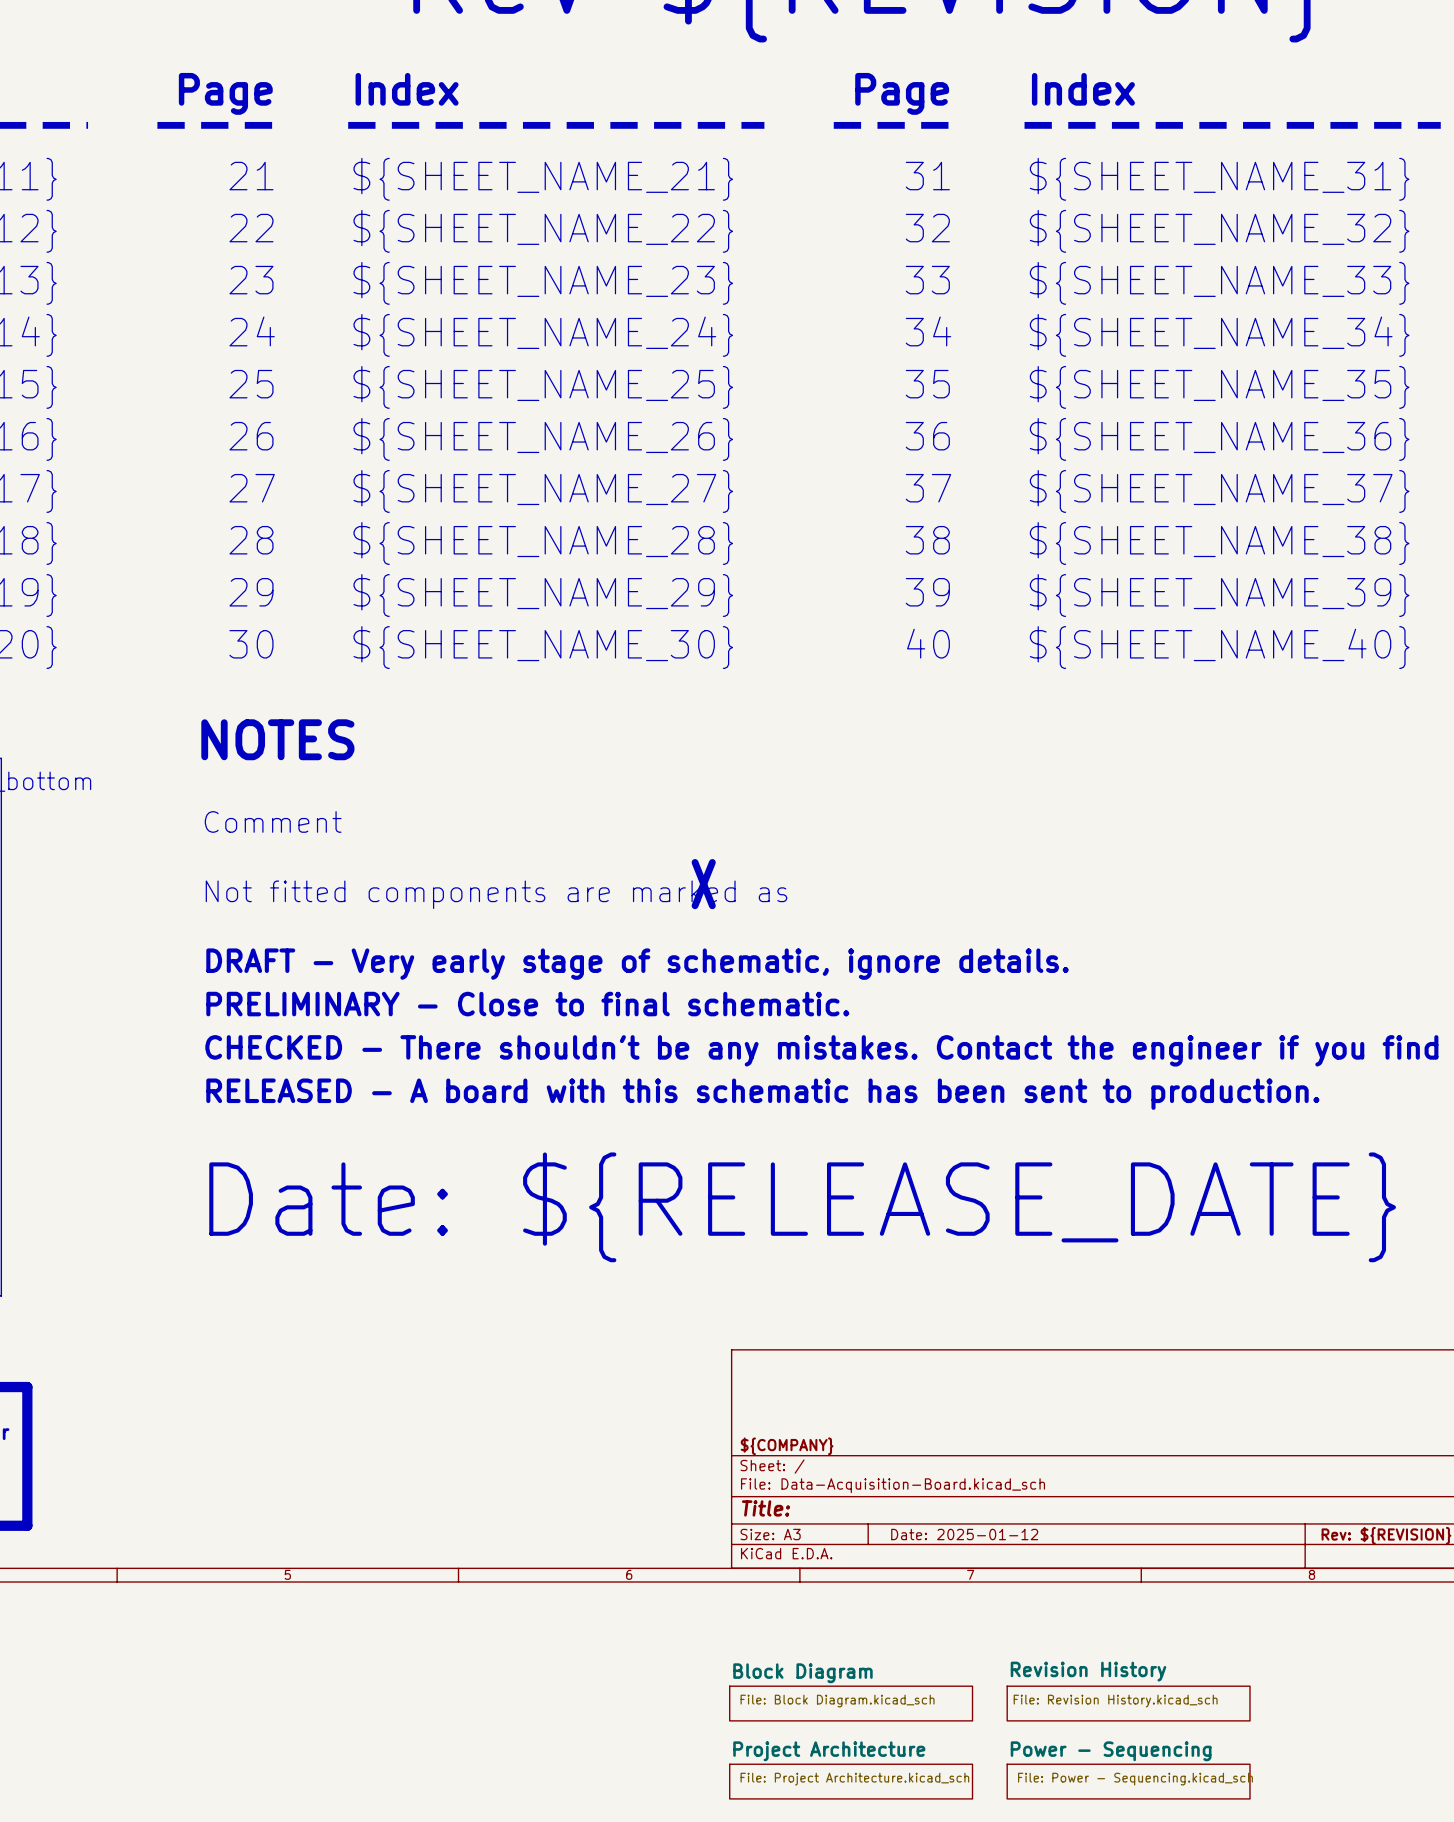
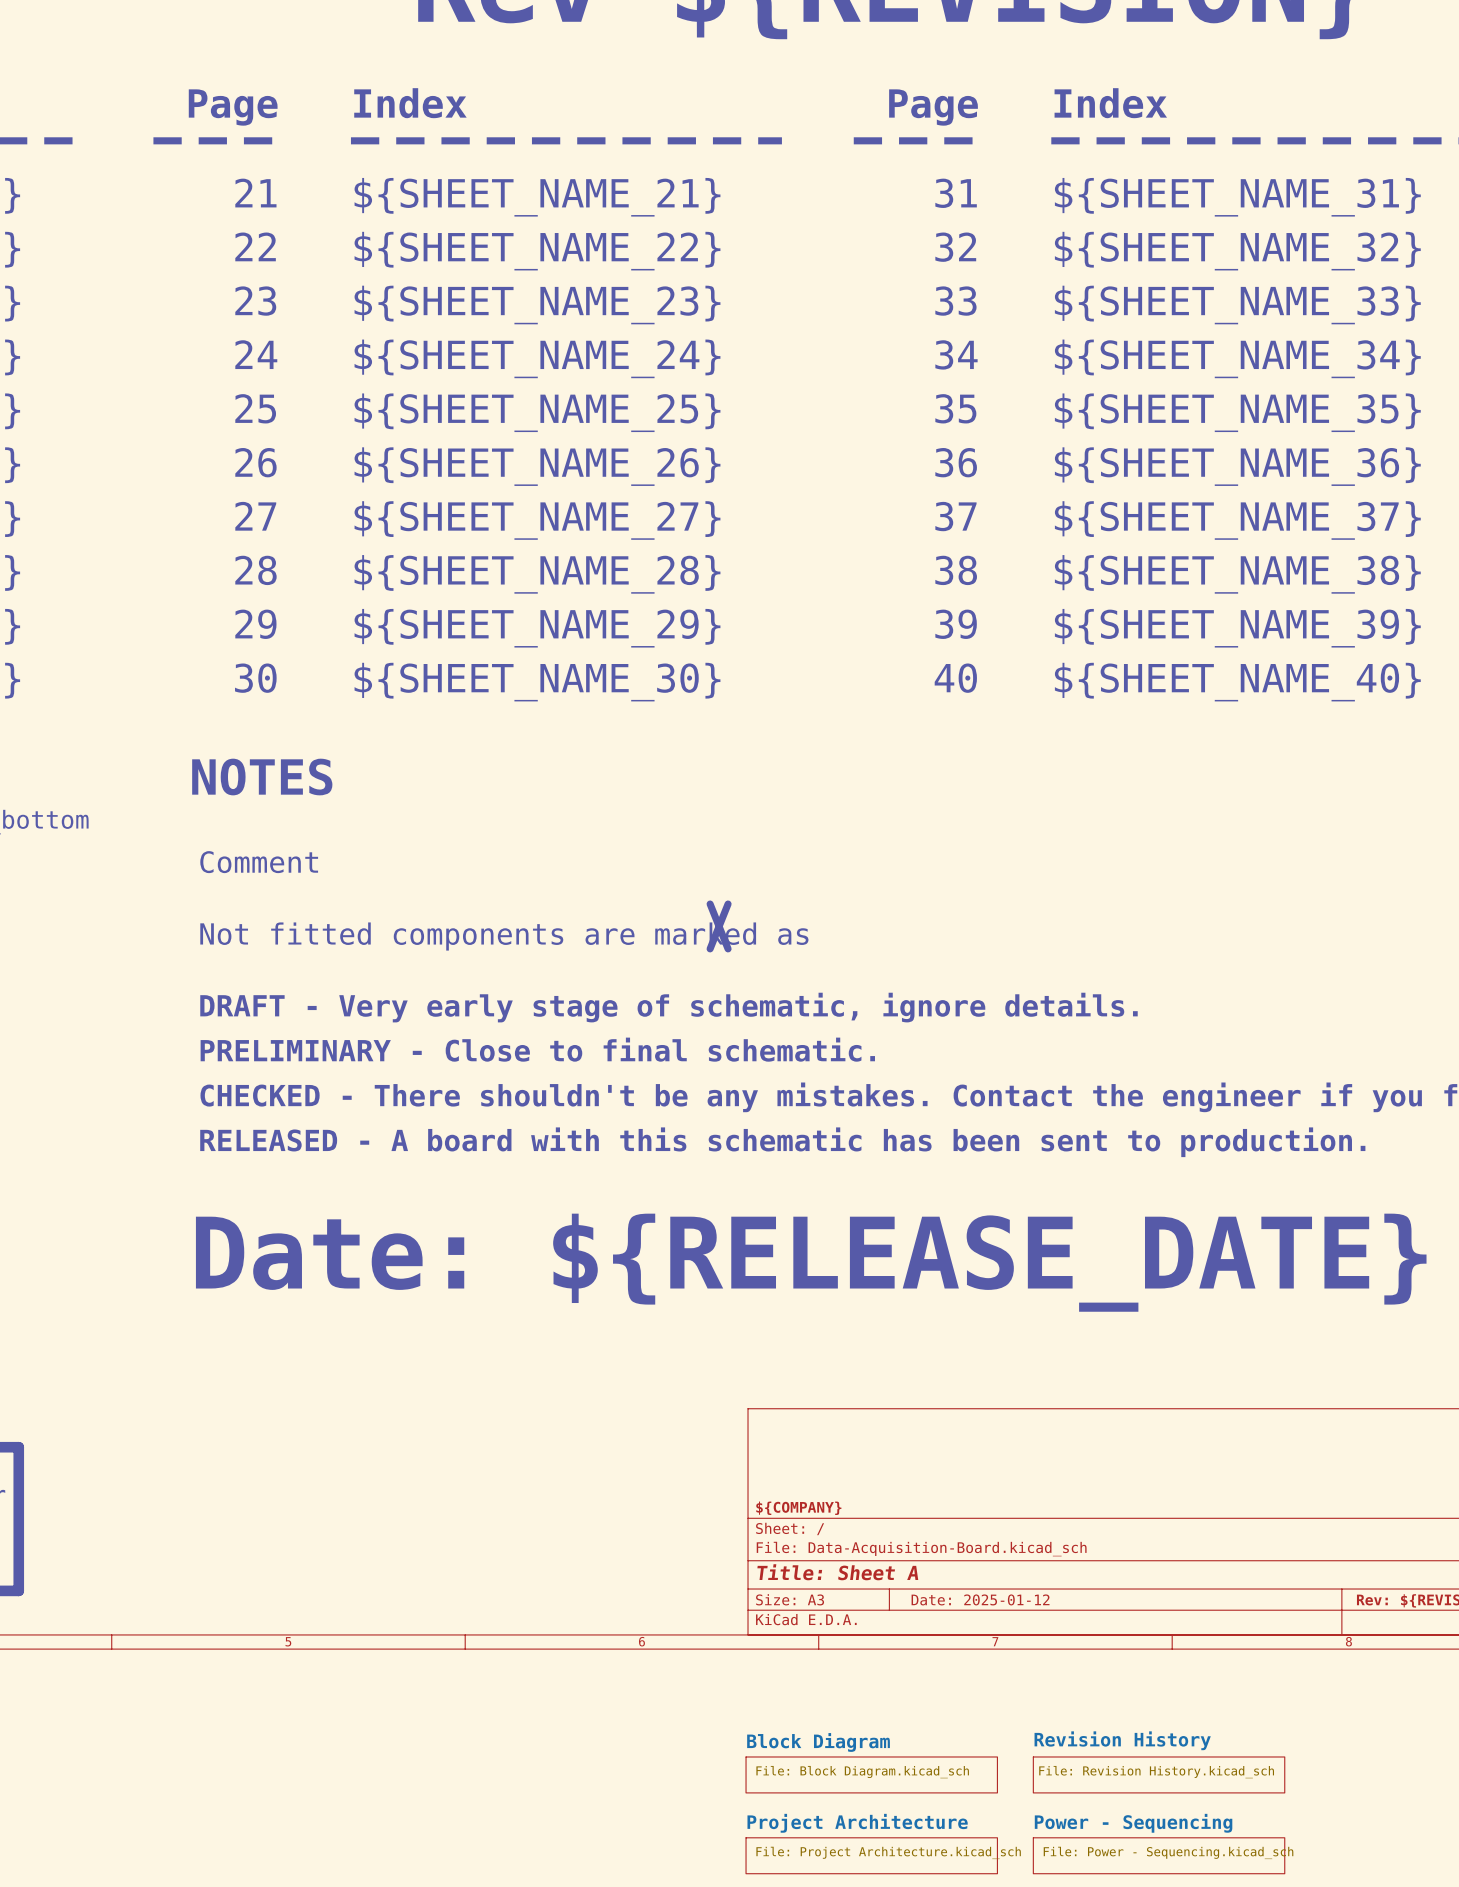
title block: Title: (765, 1508) -> Title: Sheet A (837, 1572)

